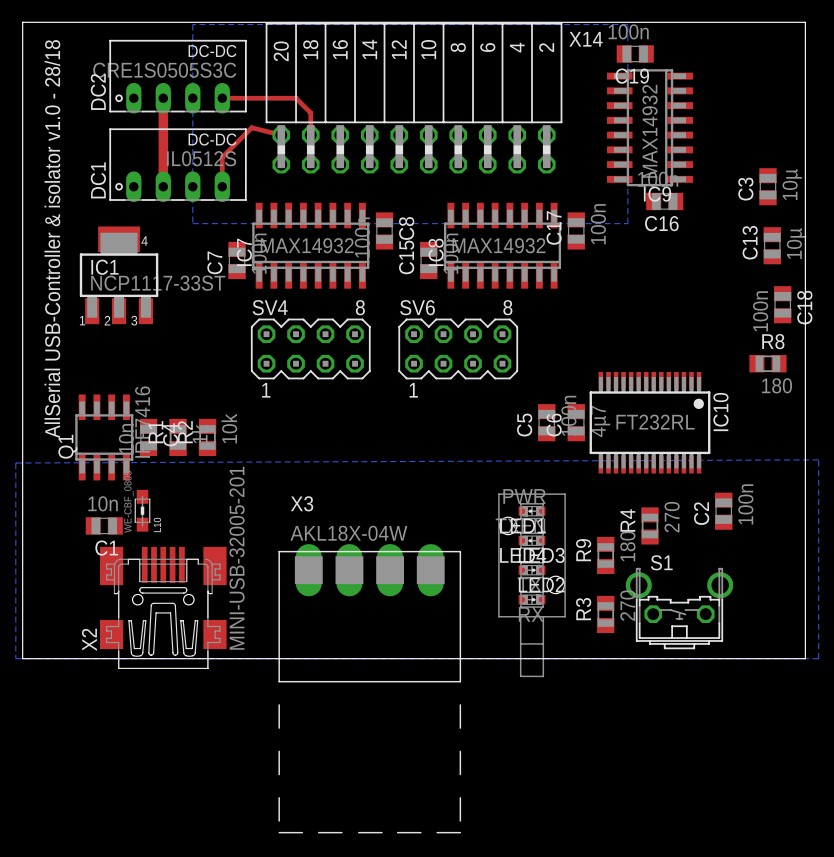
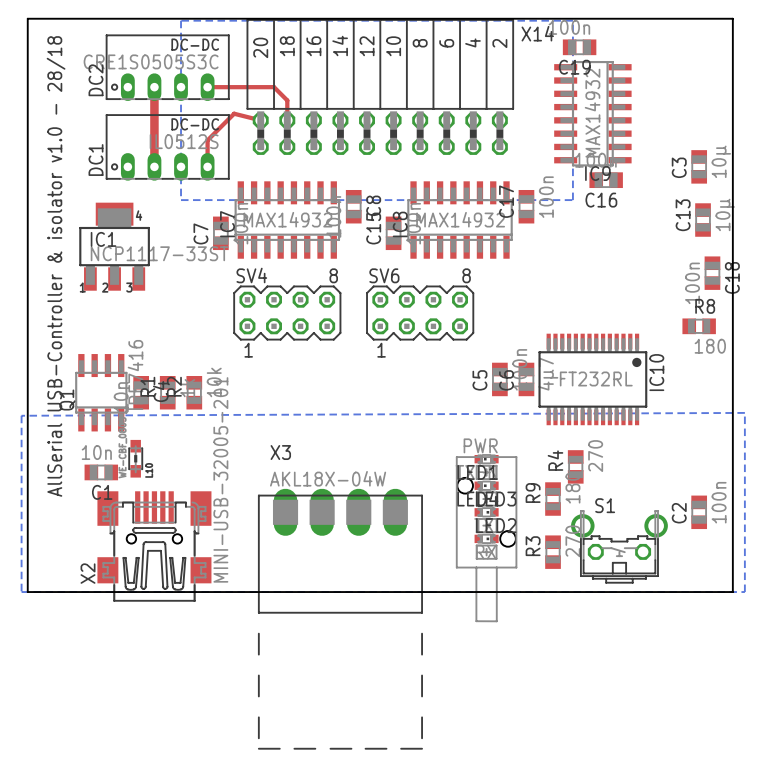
C2 position: (723, 511) -> (699, 512)
R4 position: (649, 525) -> (575, 466)
part position: (532, 585) -> (486, 539)

